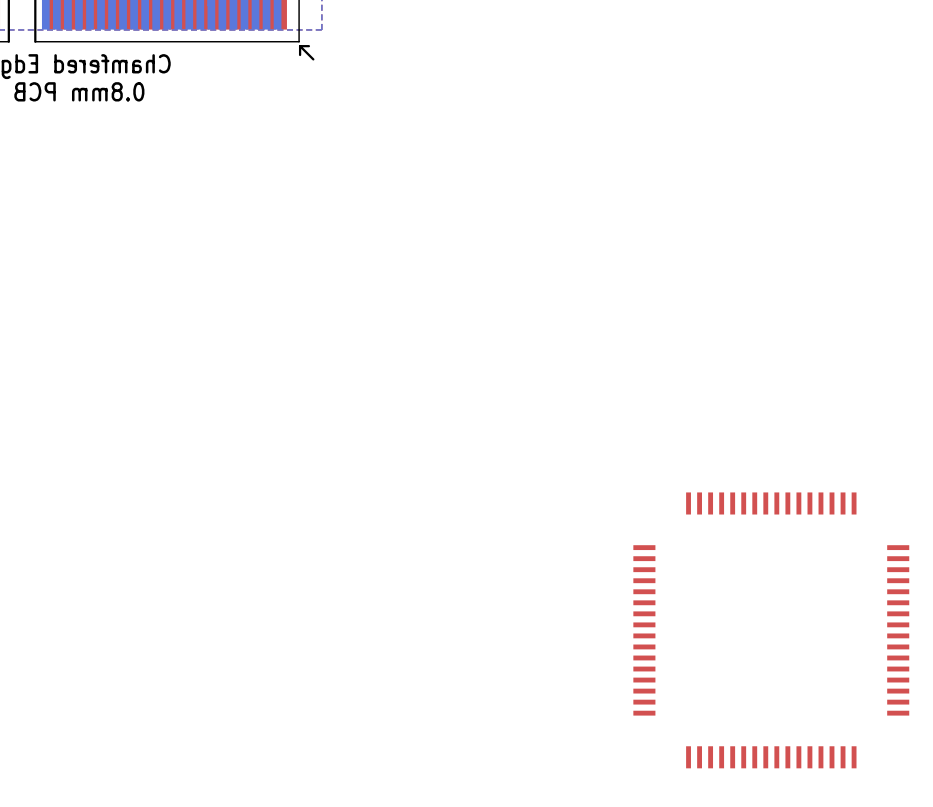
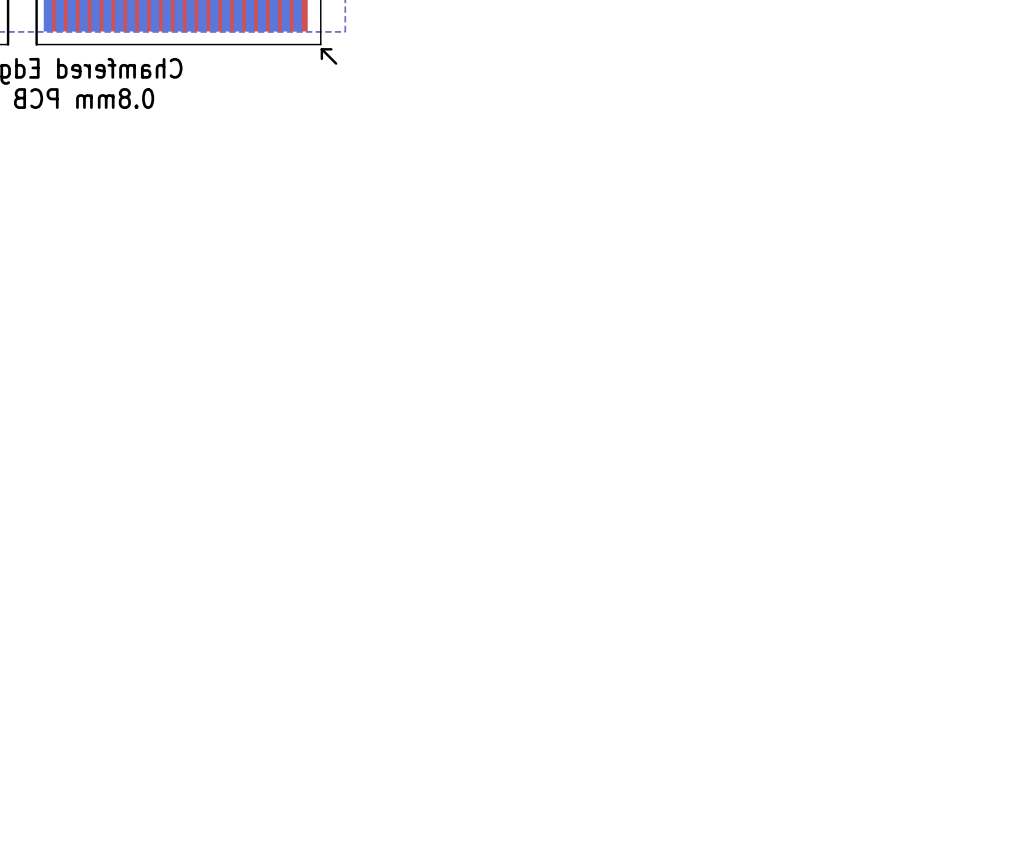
part: (771, 630) -> none

